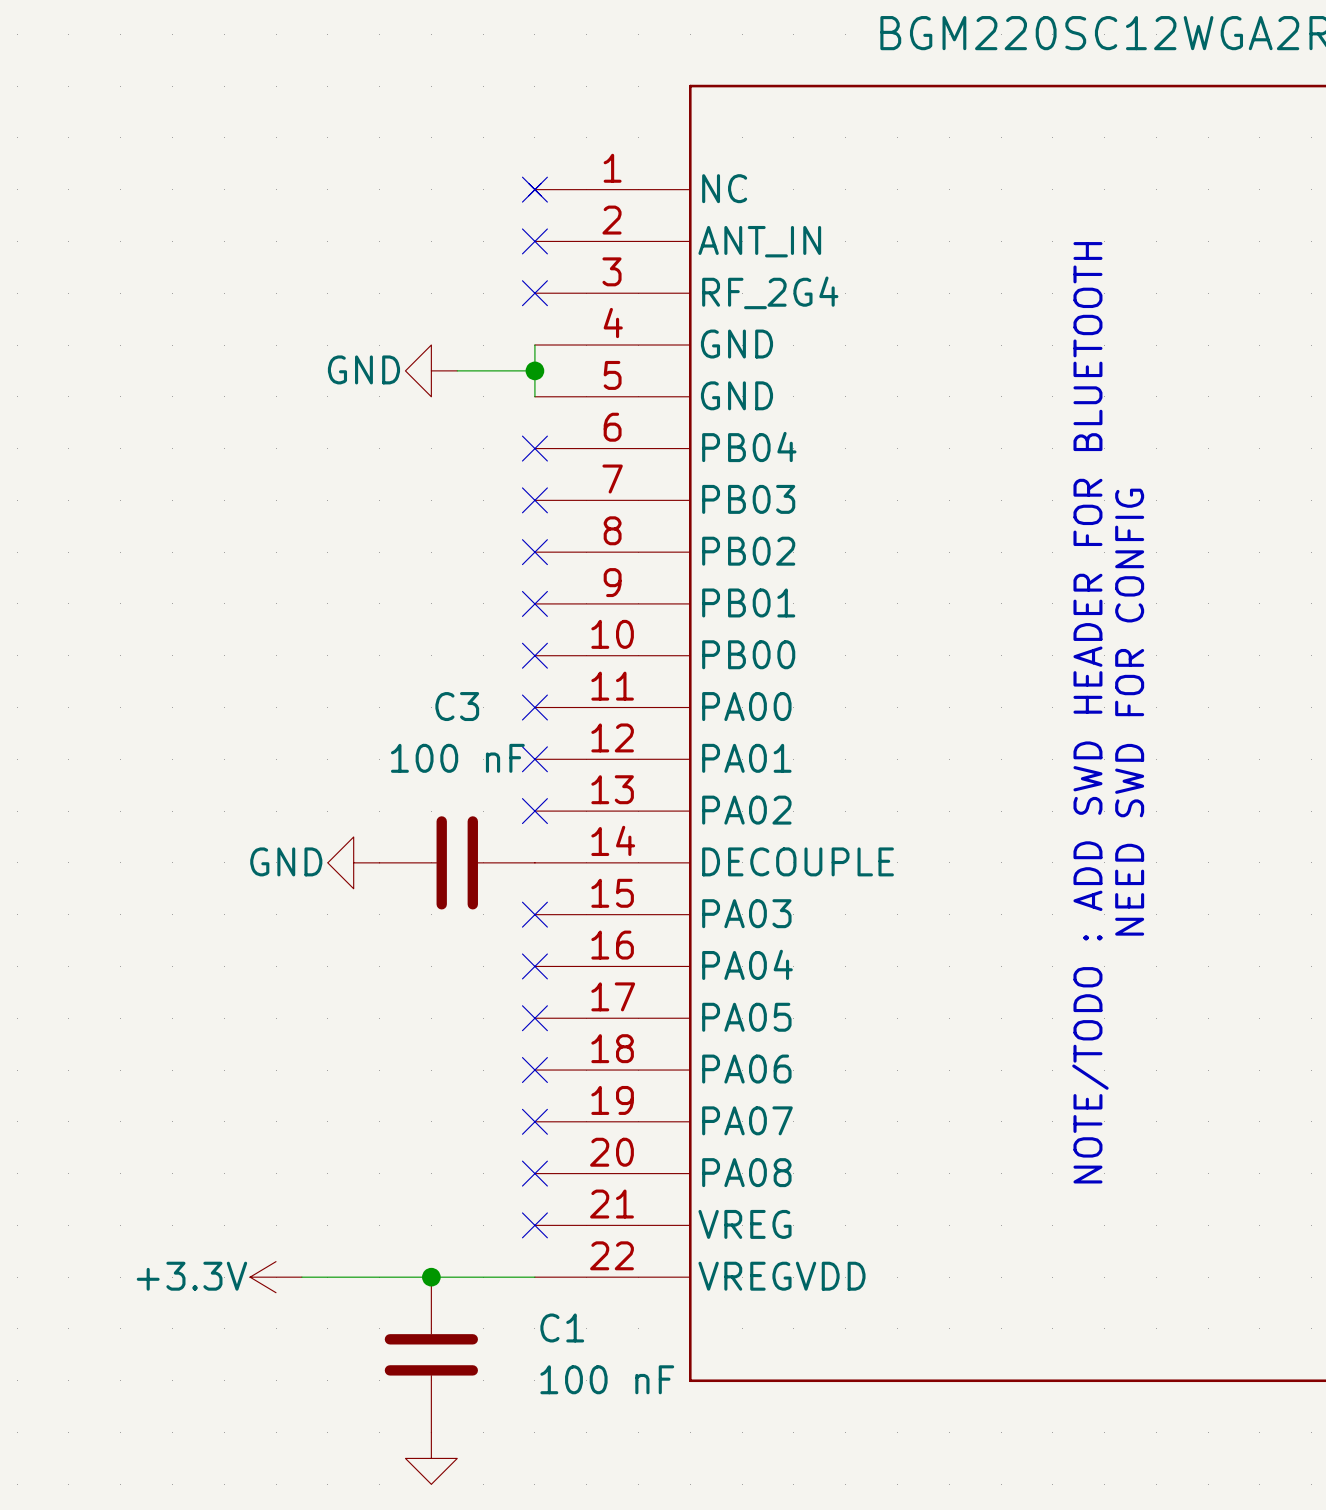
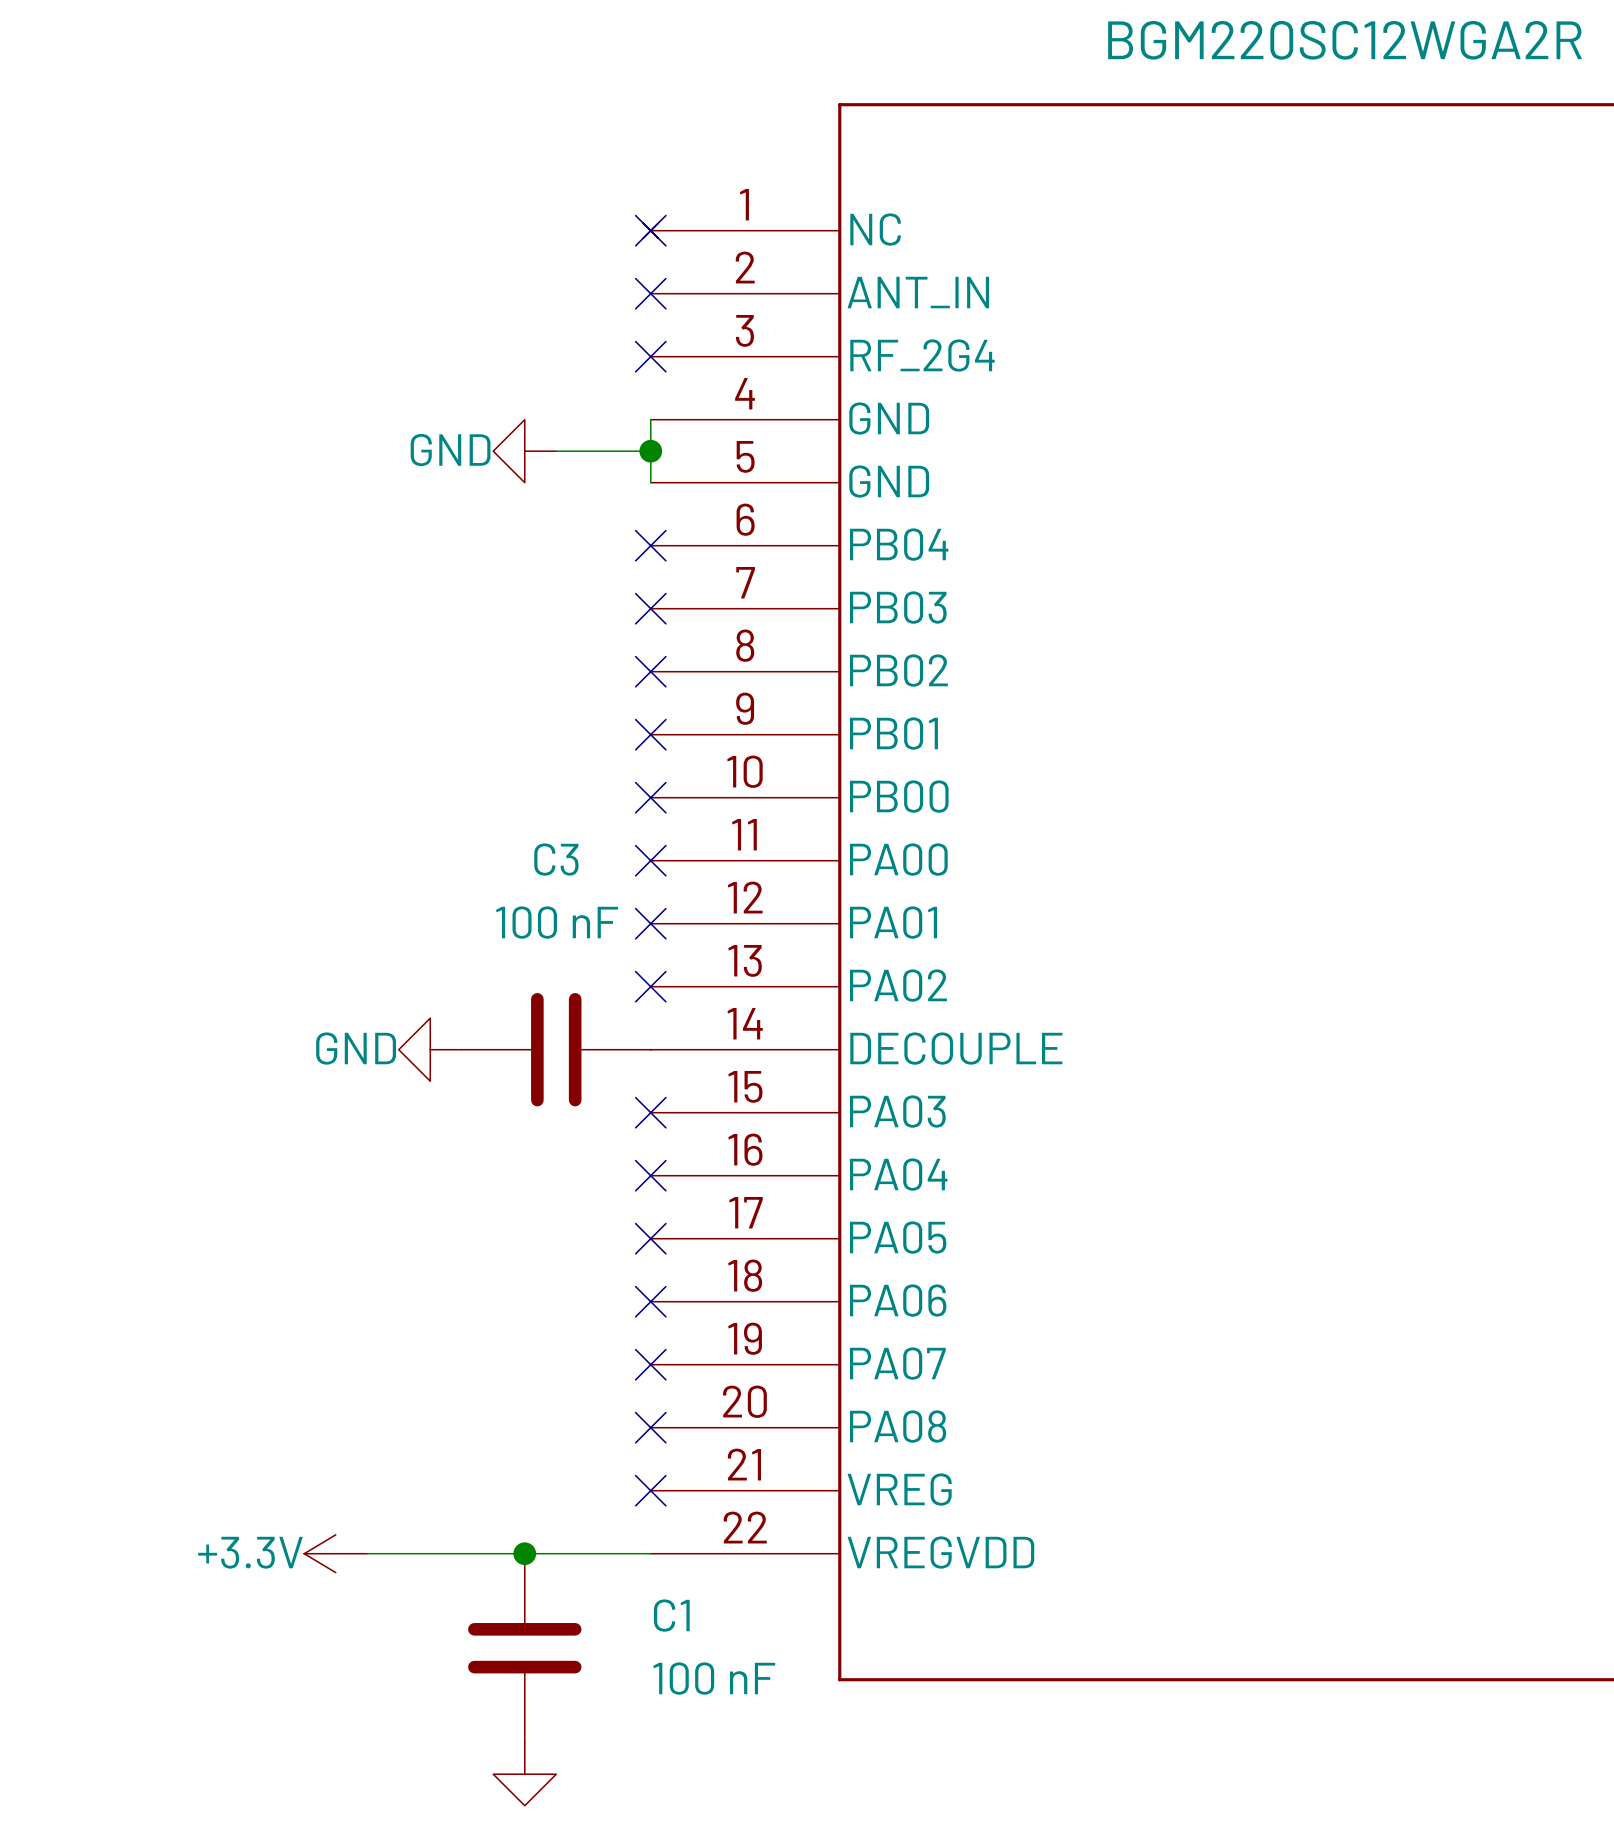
text: NOTE/TODO : ADD SWD HEADER FOR BLUETOOTH (1090, 712) -> none
text: NEED SWD FOR CONFIG (1129, 712) -> none

